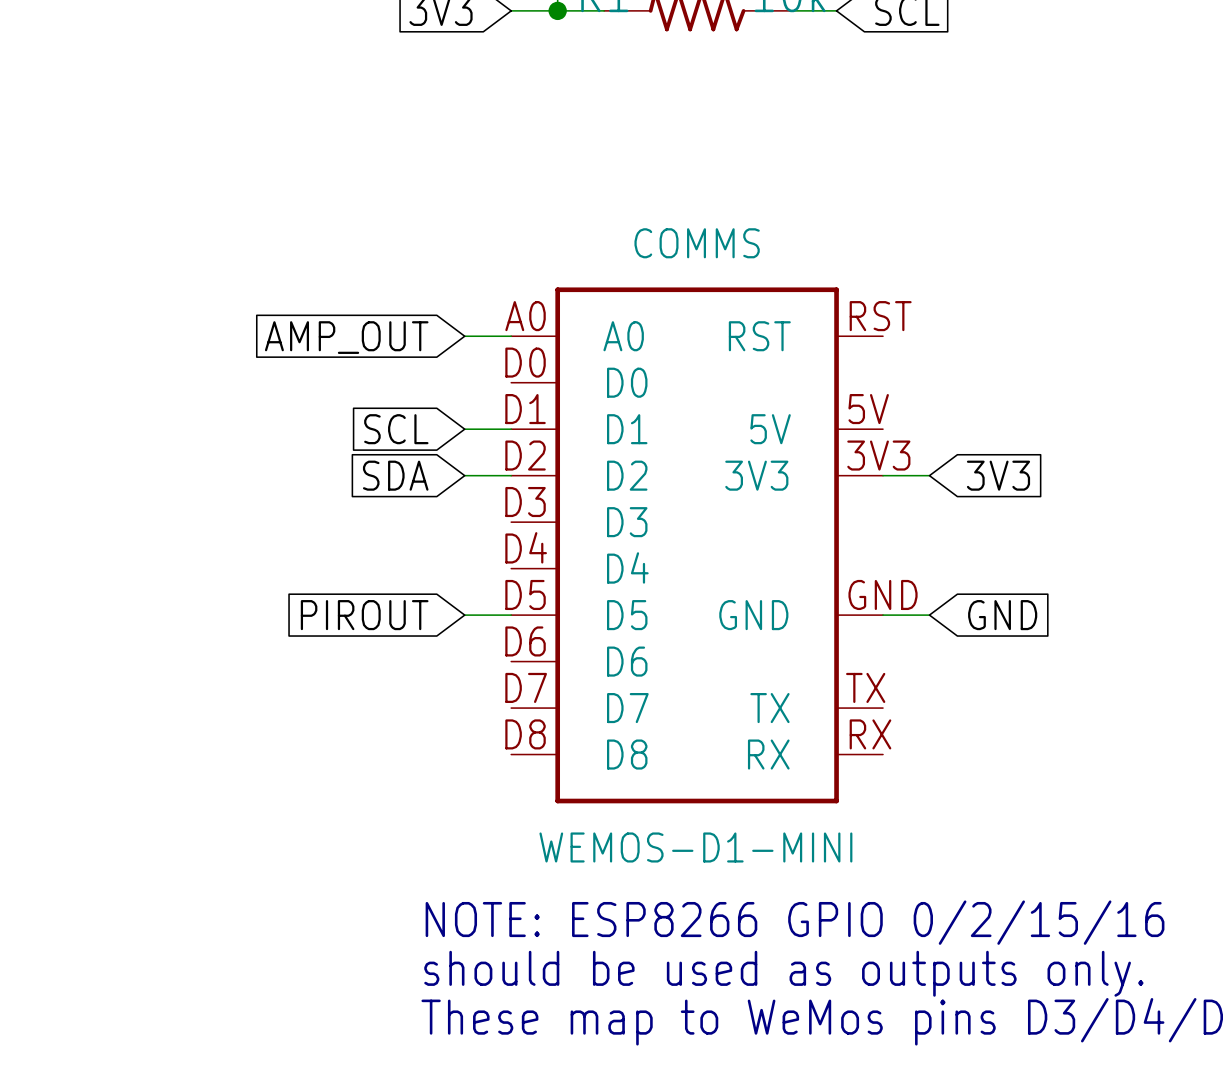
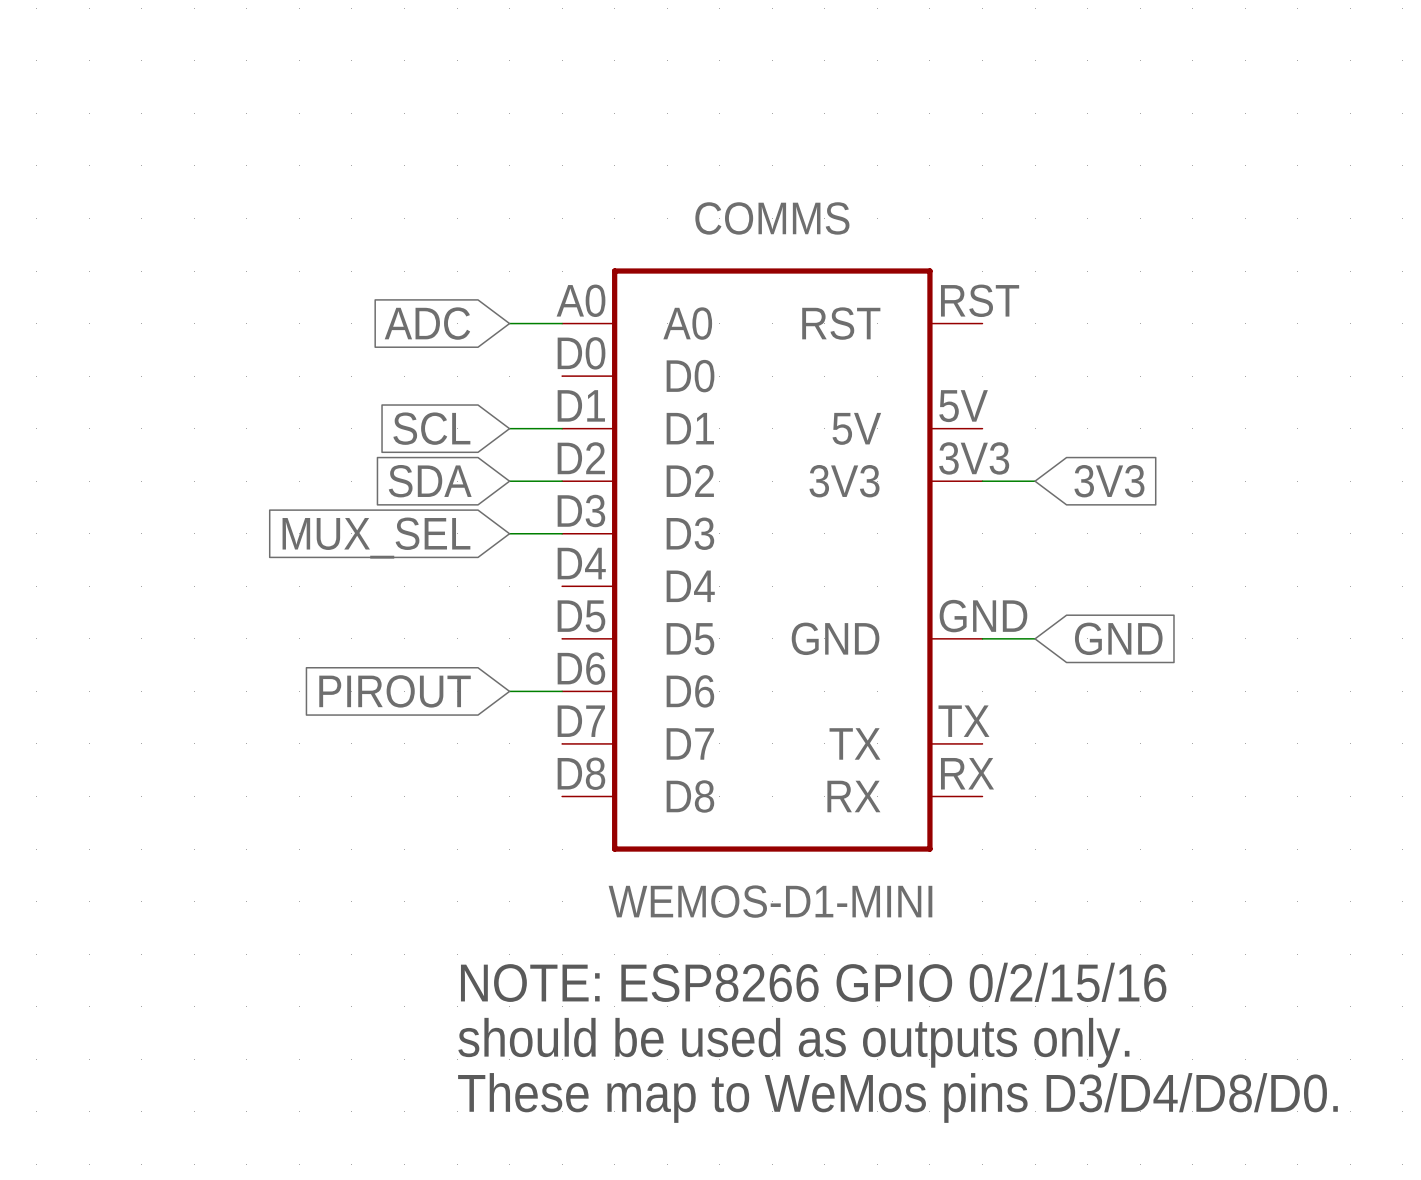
global label: AMP_OUT (346, 337) -> ADC (427, 323)
wire: none -> (509, 533) (562, 533)
global label: none -> MUX_SEL (376, 538)
global label position: PIROUT (364, 615) -> PIROUT (395, 691)
wire: (464, 615) (511, 615) -> (509, 691) (562, 691)

